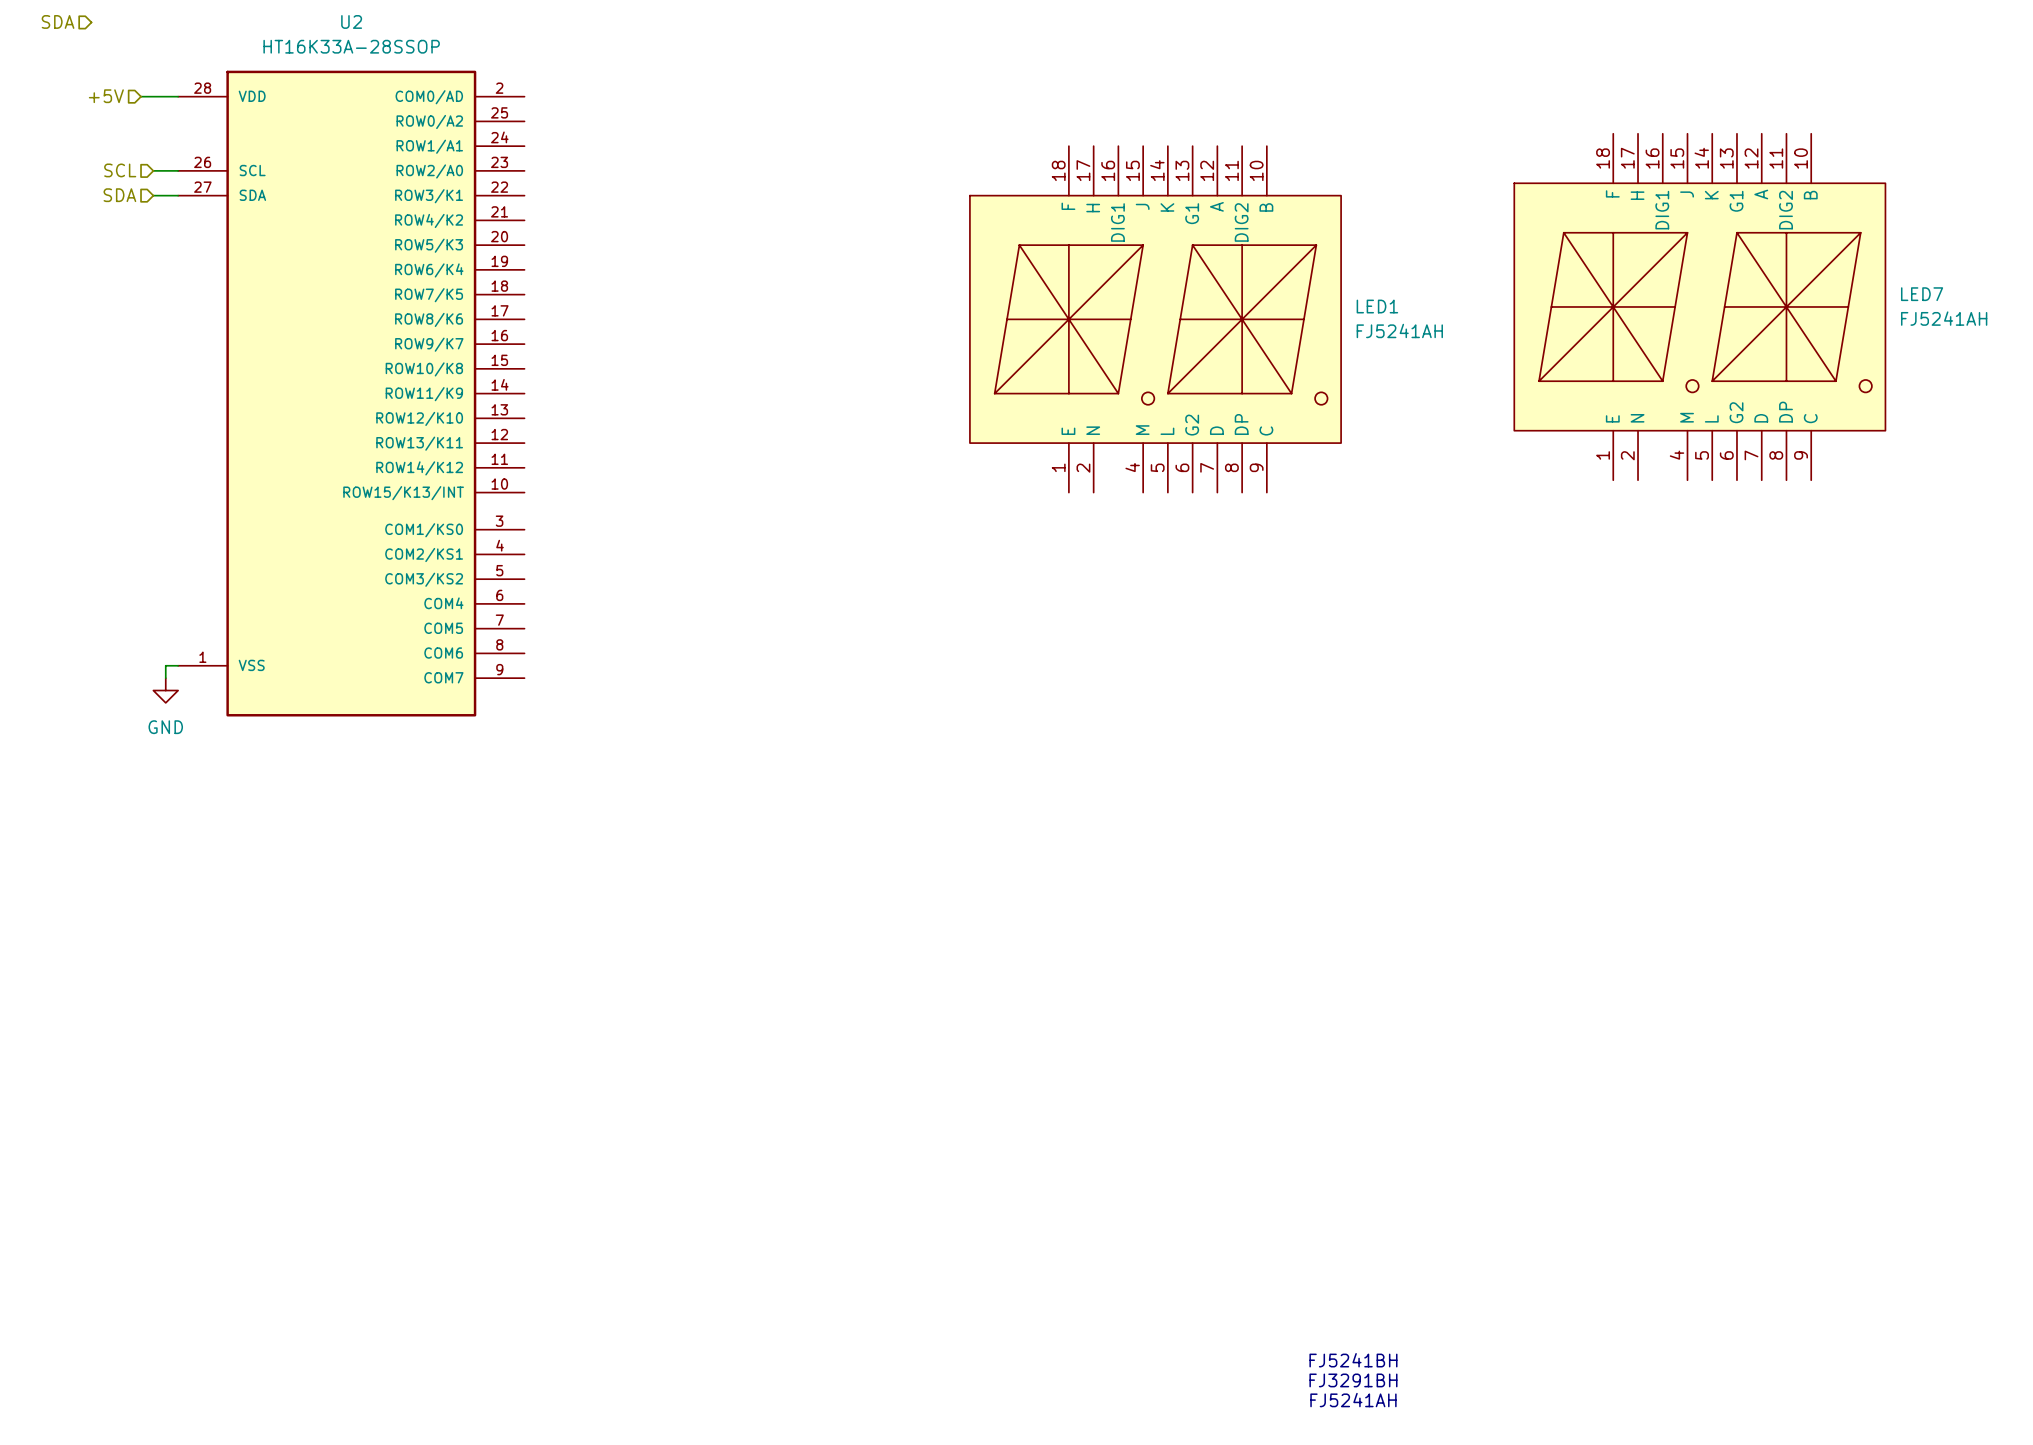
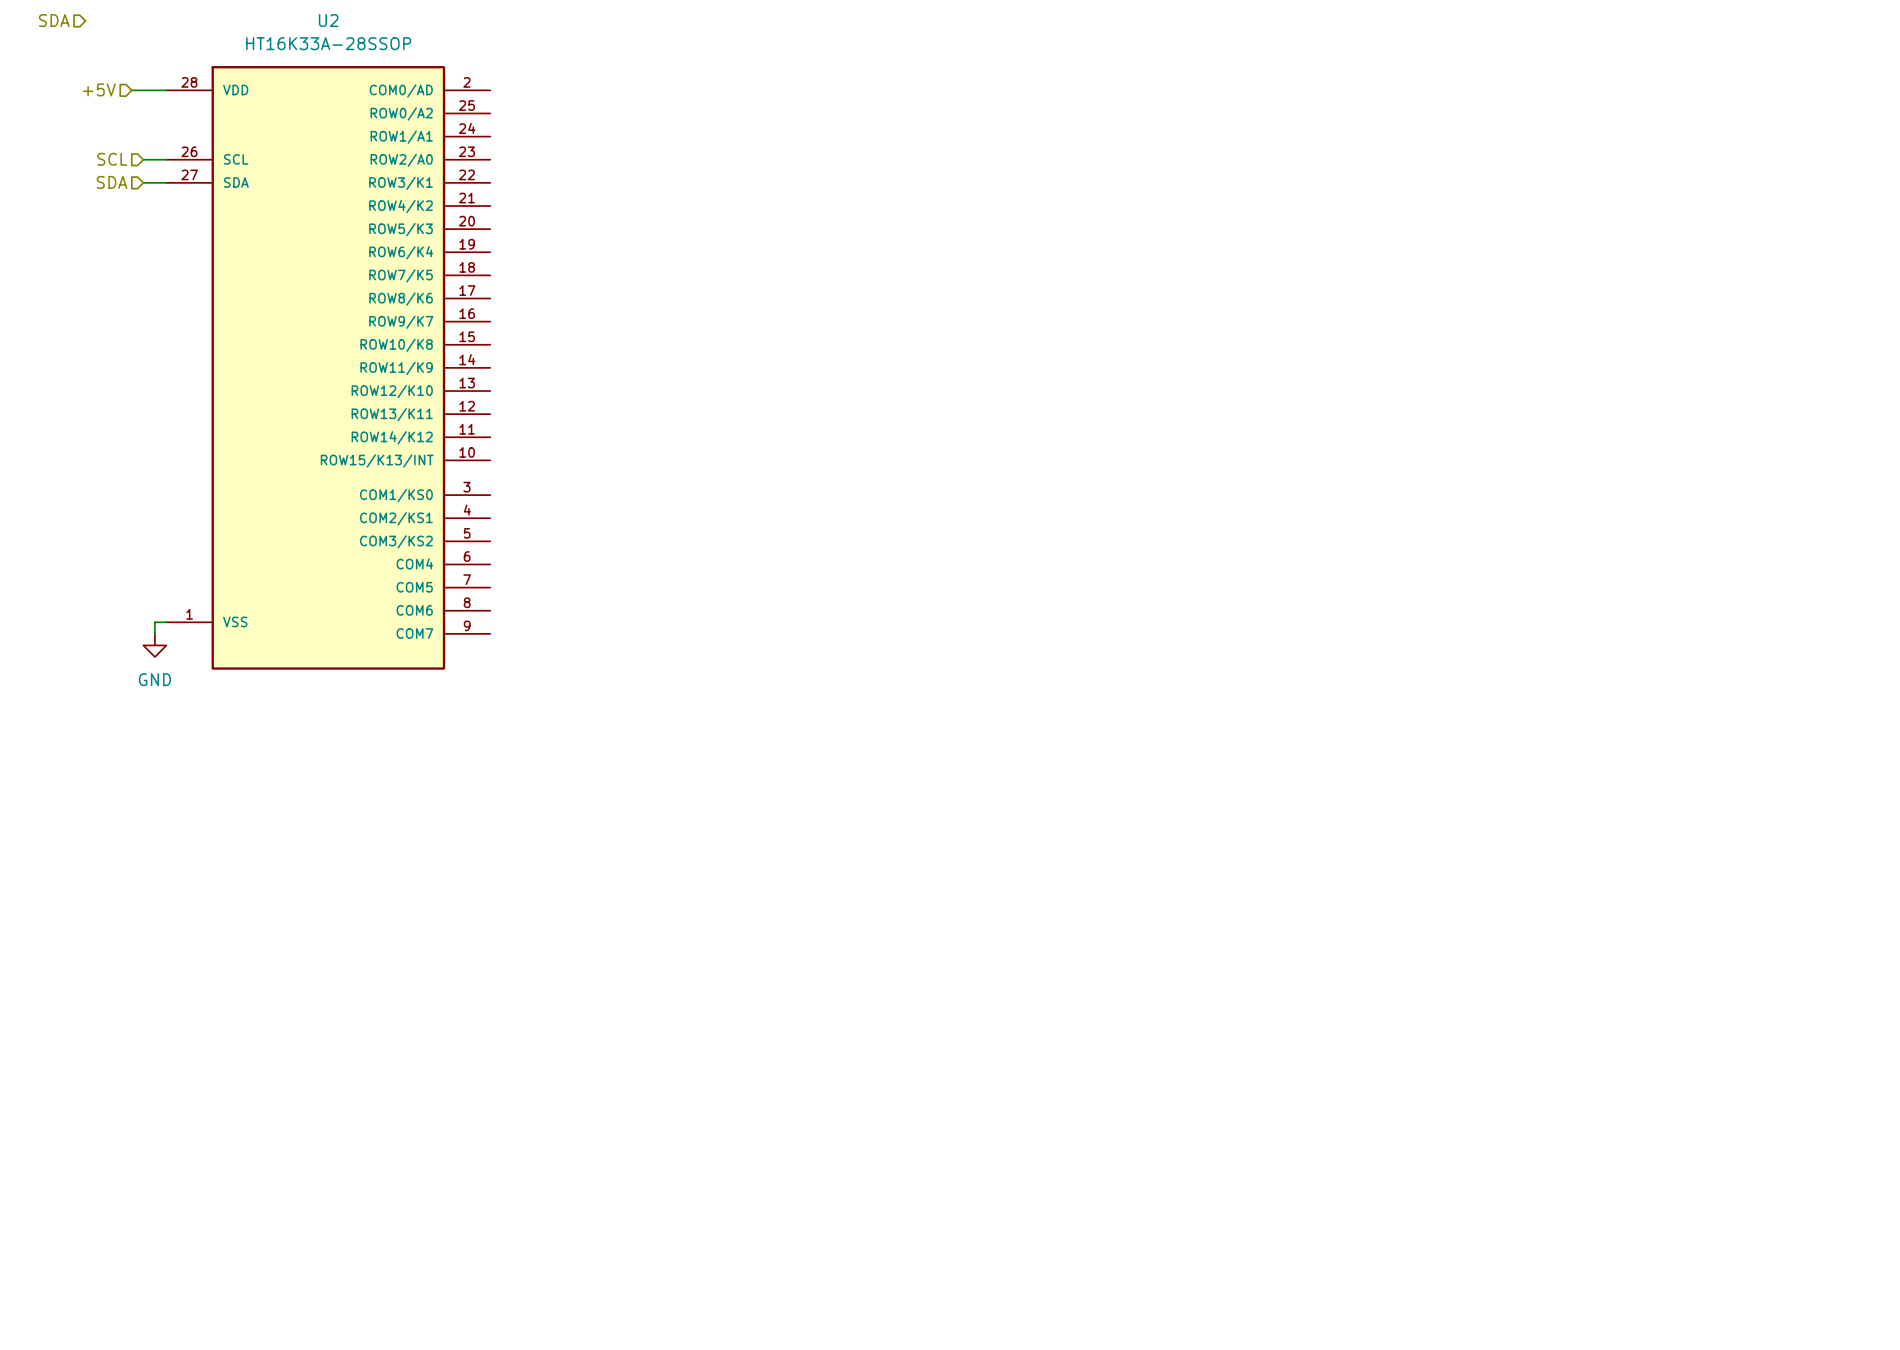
LED7: FJ5241AH (1699, 306) -> none
LED1: FJ5241AH (1155, 319) -> none
text: FJ5241BH (1353, 1360) -> none
text: FJ3291BH (1353, 1380) -> none
text: FJ5241AH (1353, 1400) -> none

